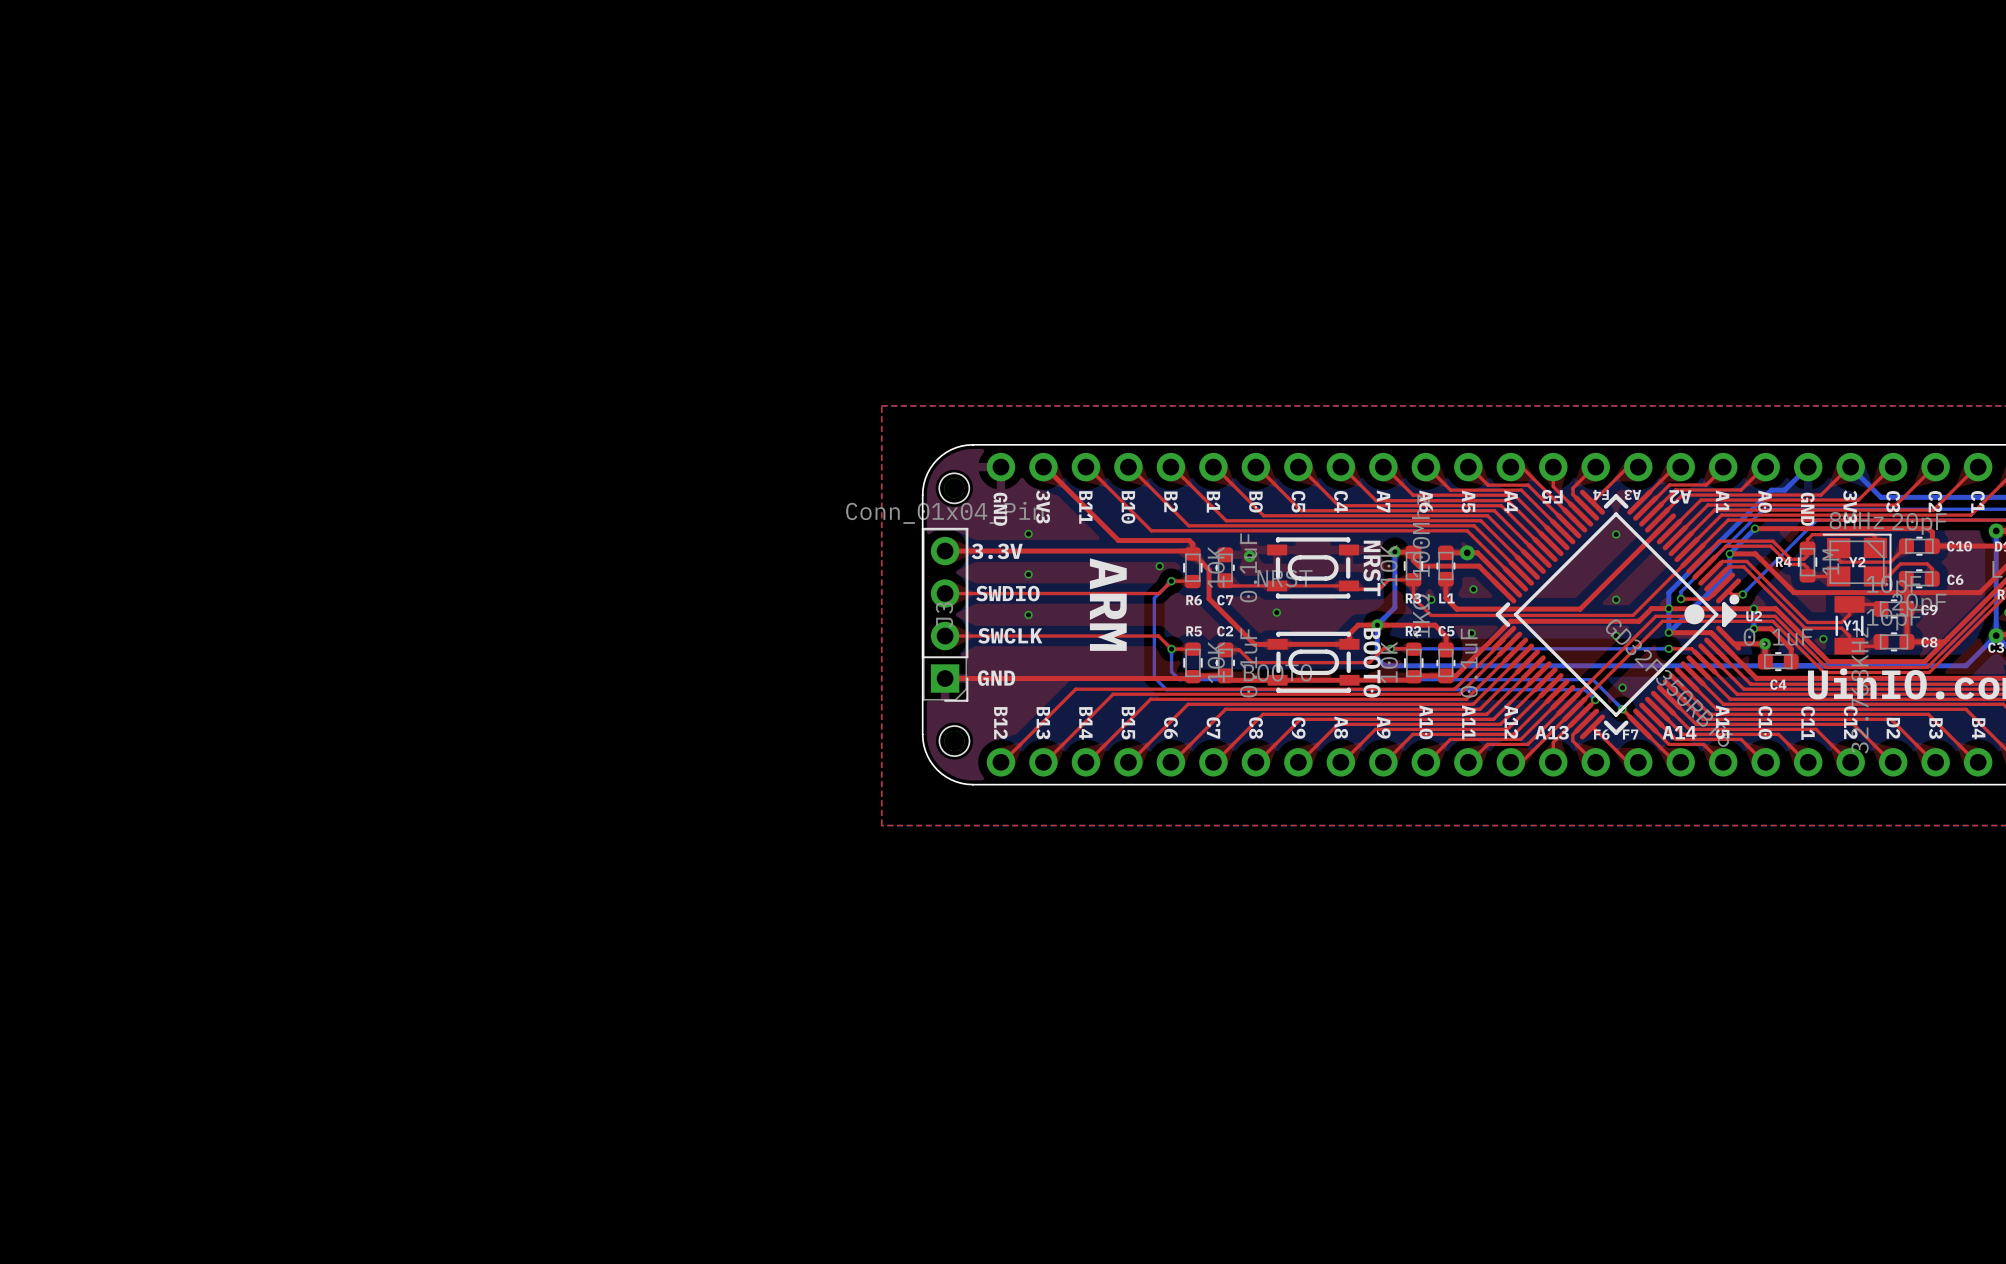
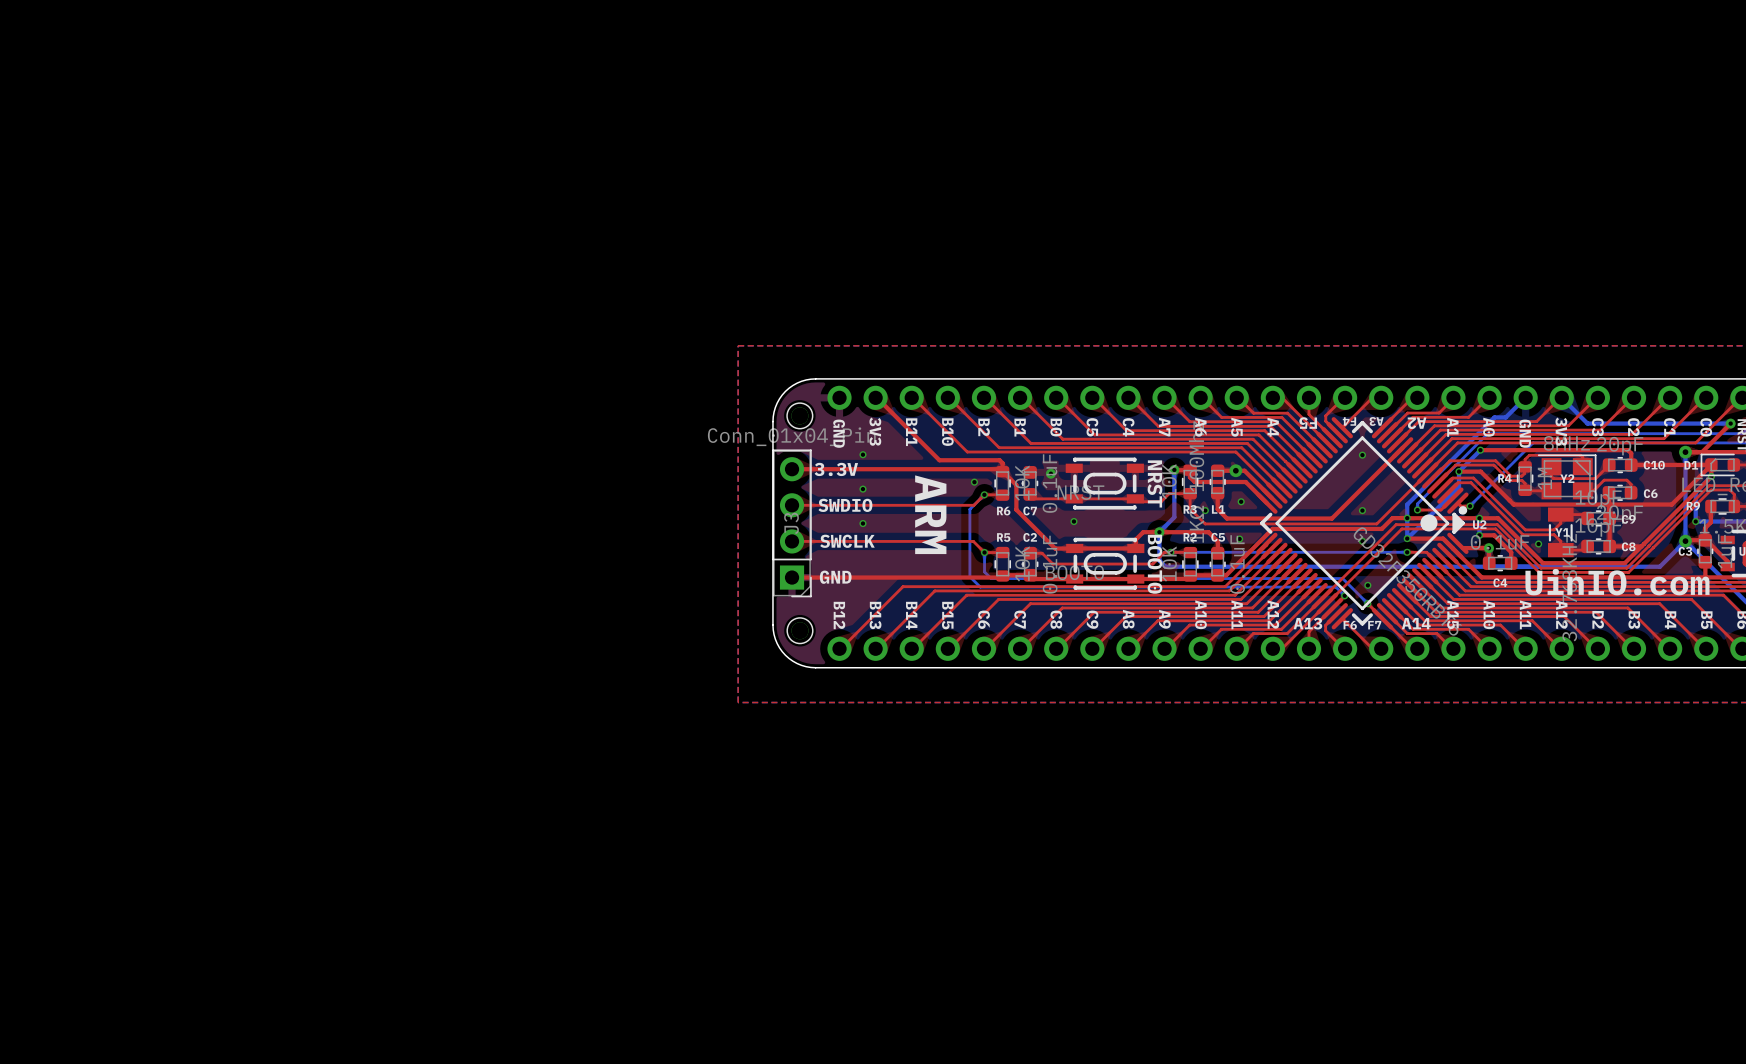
text: C10 (1765, 722) -> A10 (1489, 614)
text: C12 (1850, 722) -> A12 (1561, 614)
text: C11 (1808, 723) -> A11 (1525, 614)

